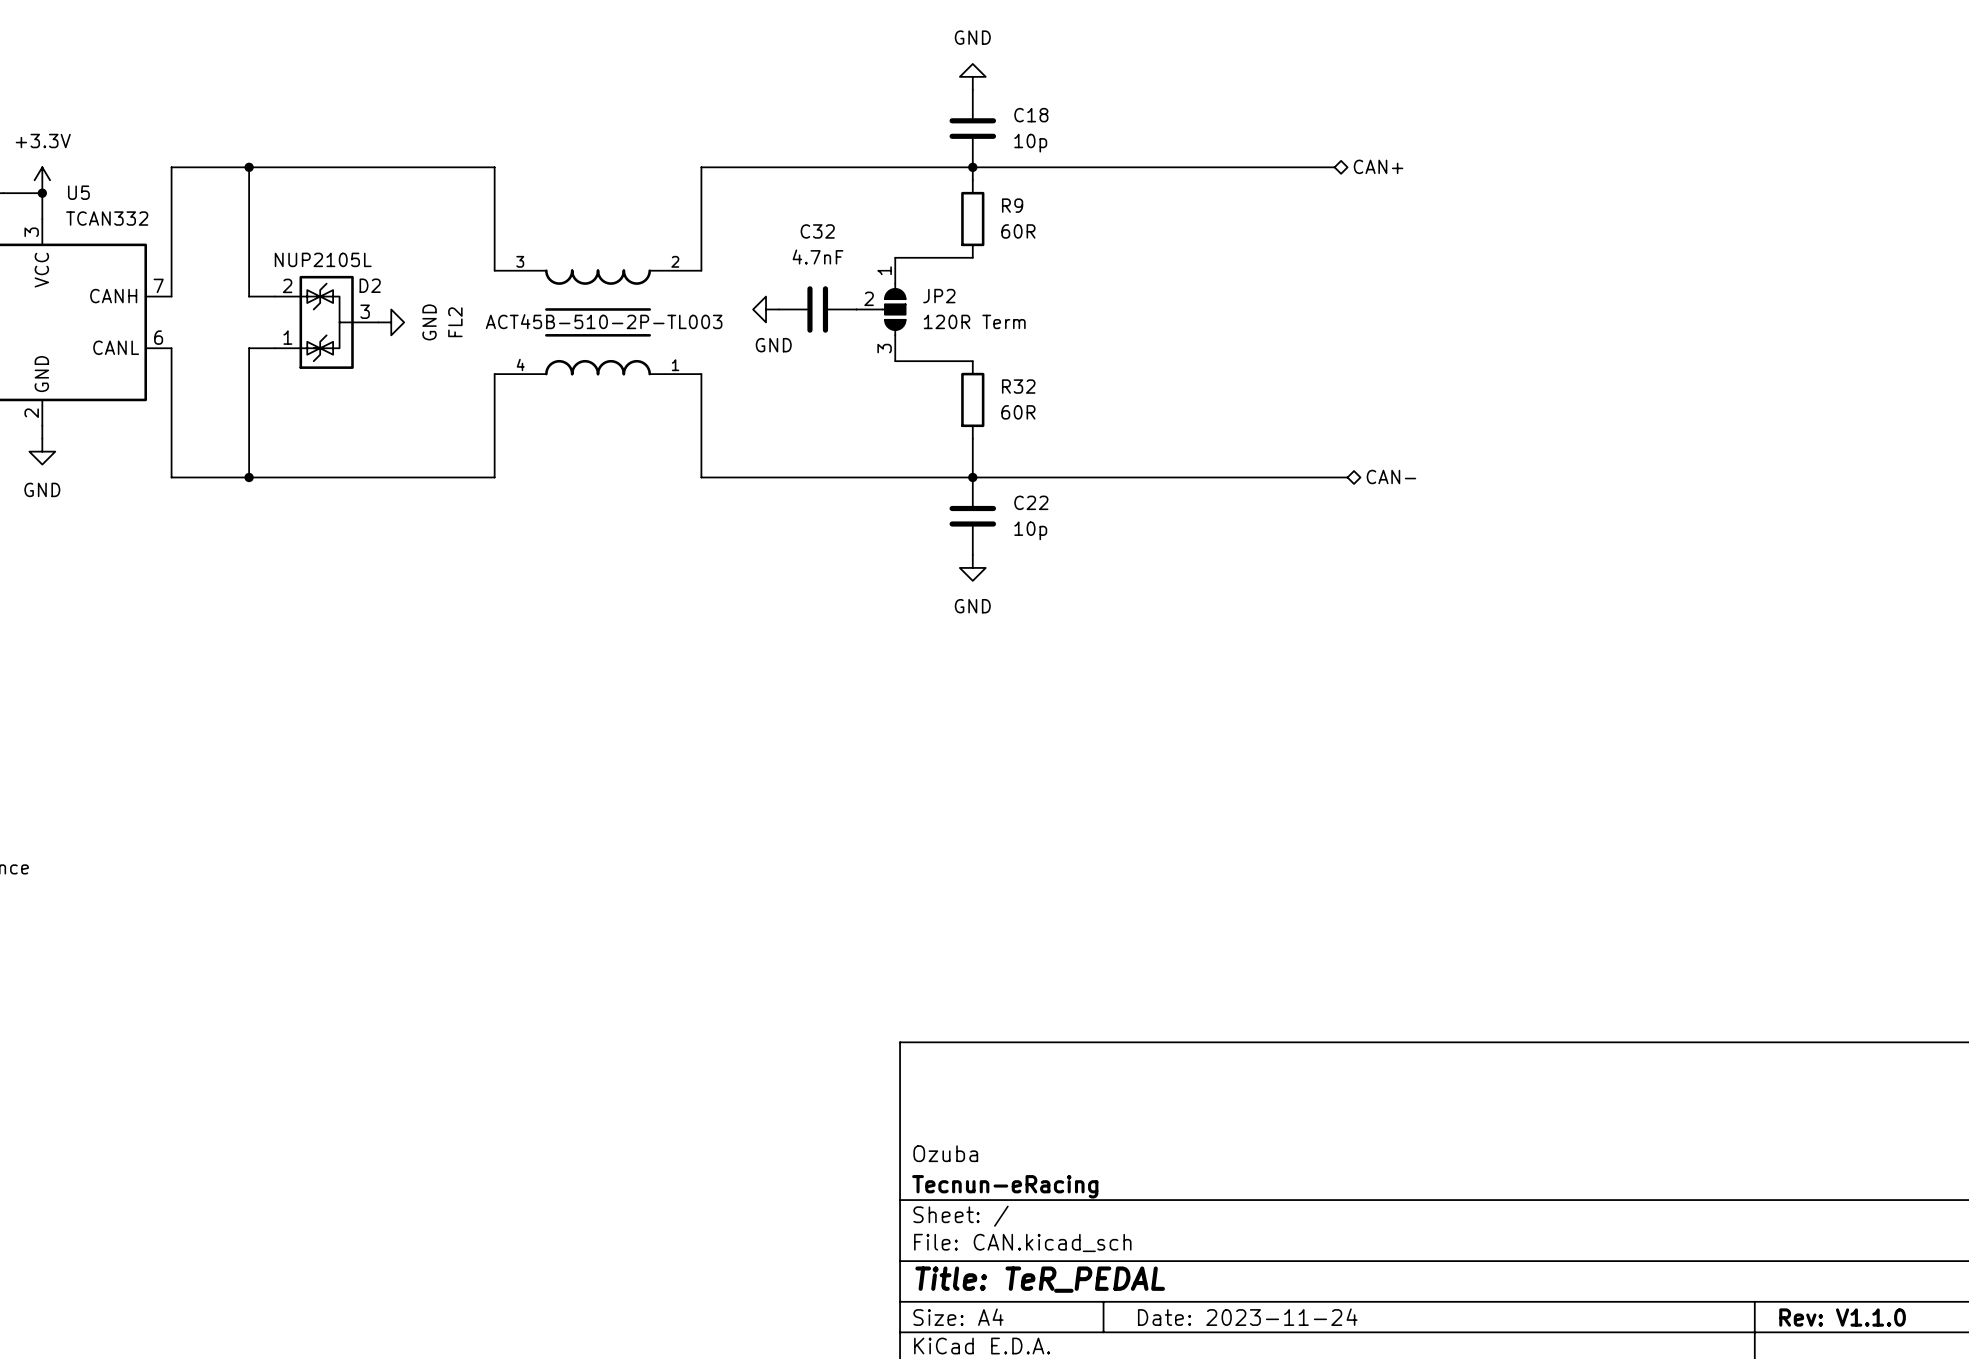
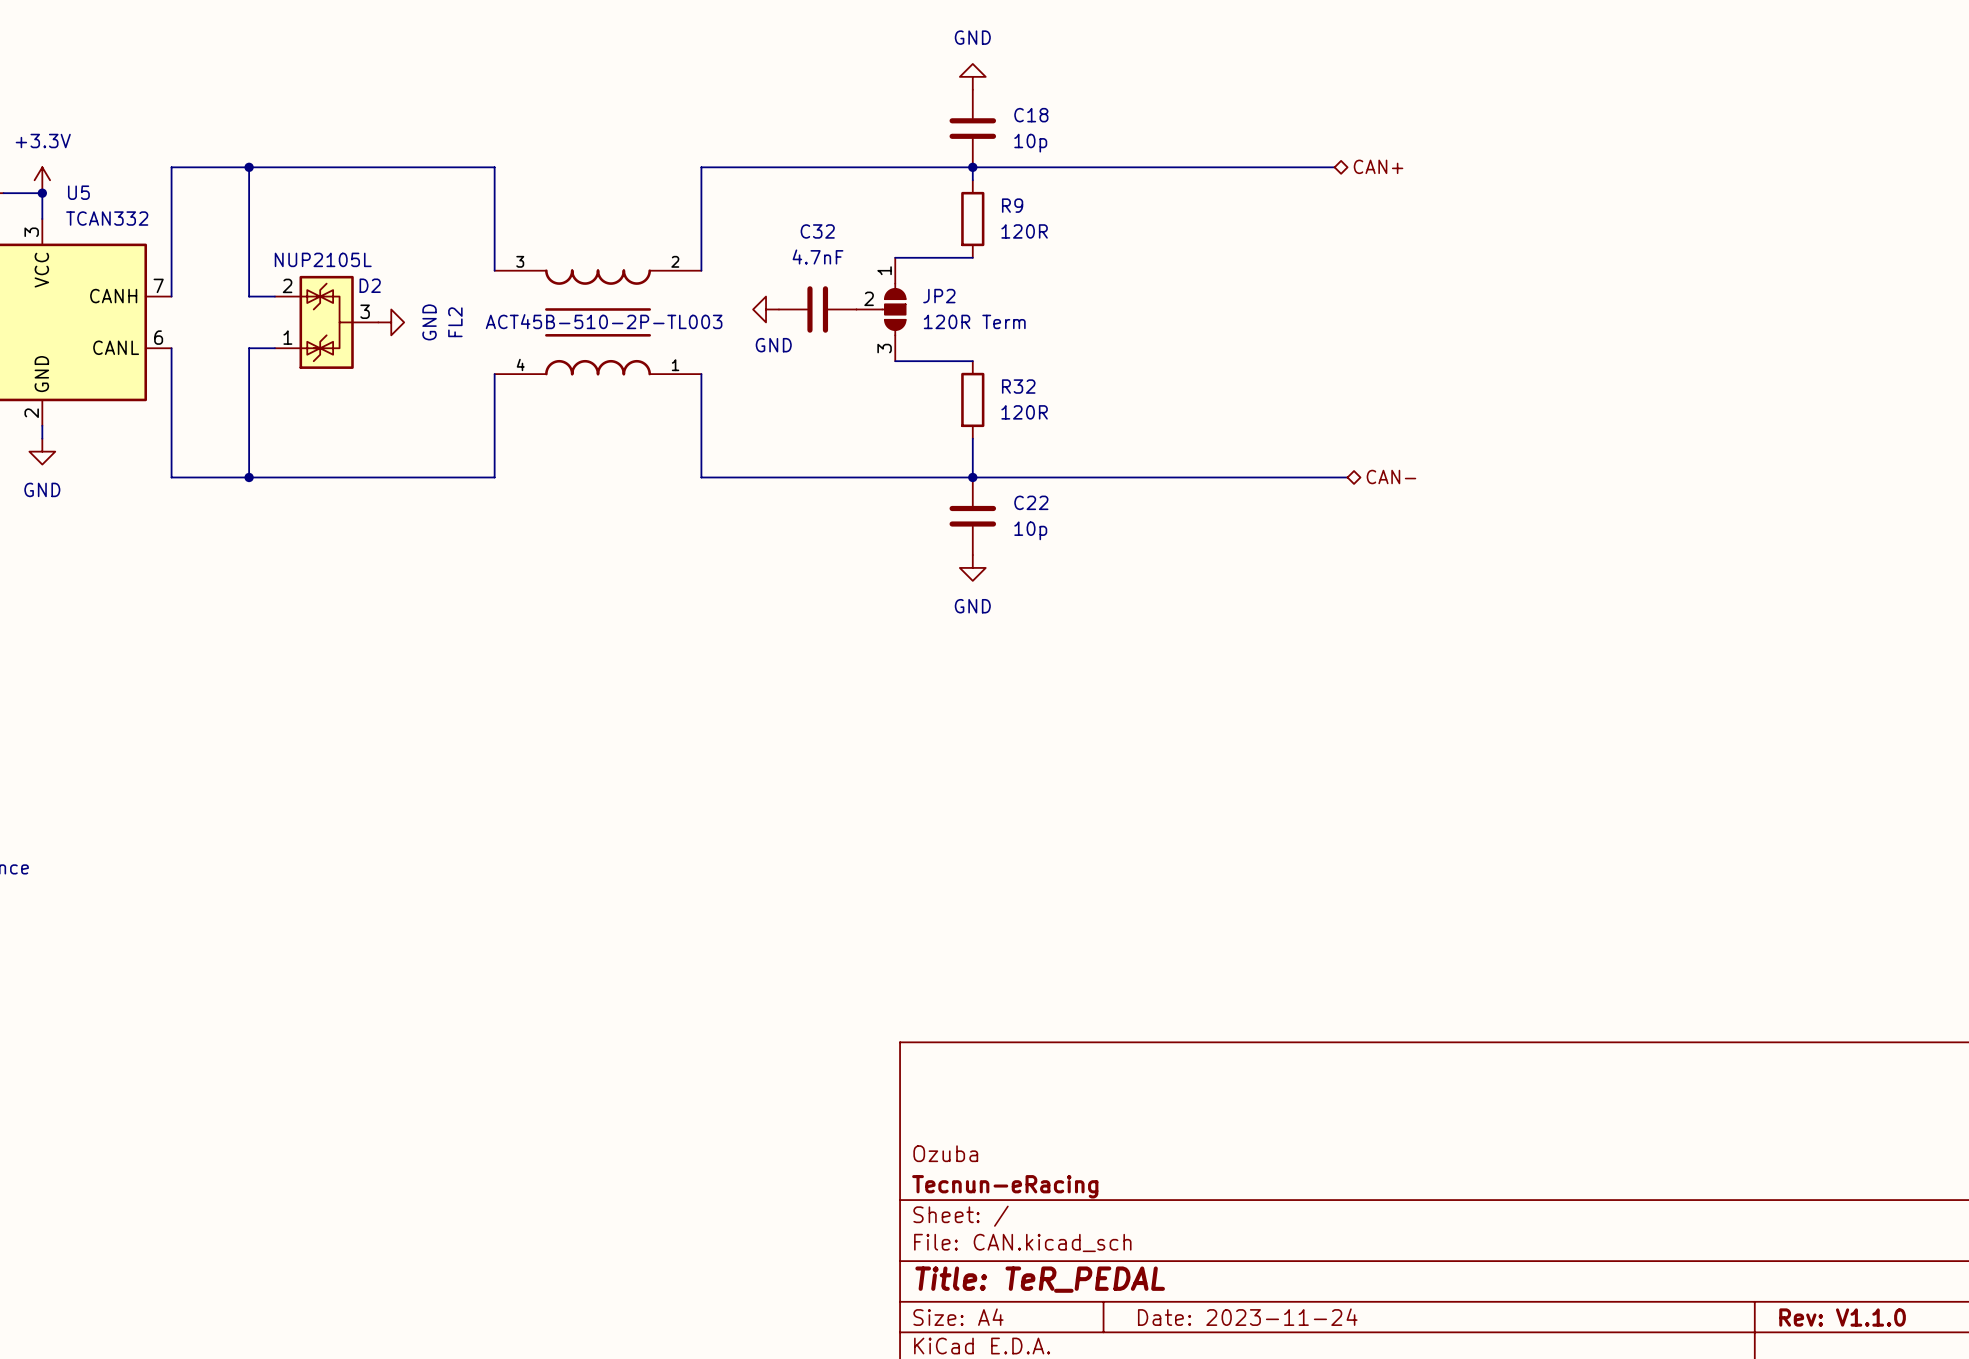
R9 value: 60R (1018, 231) -> 120R (1024, 231)
R32 value: 60R (1018, 412) -> 120R (1024, 412)

